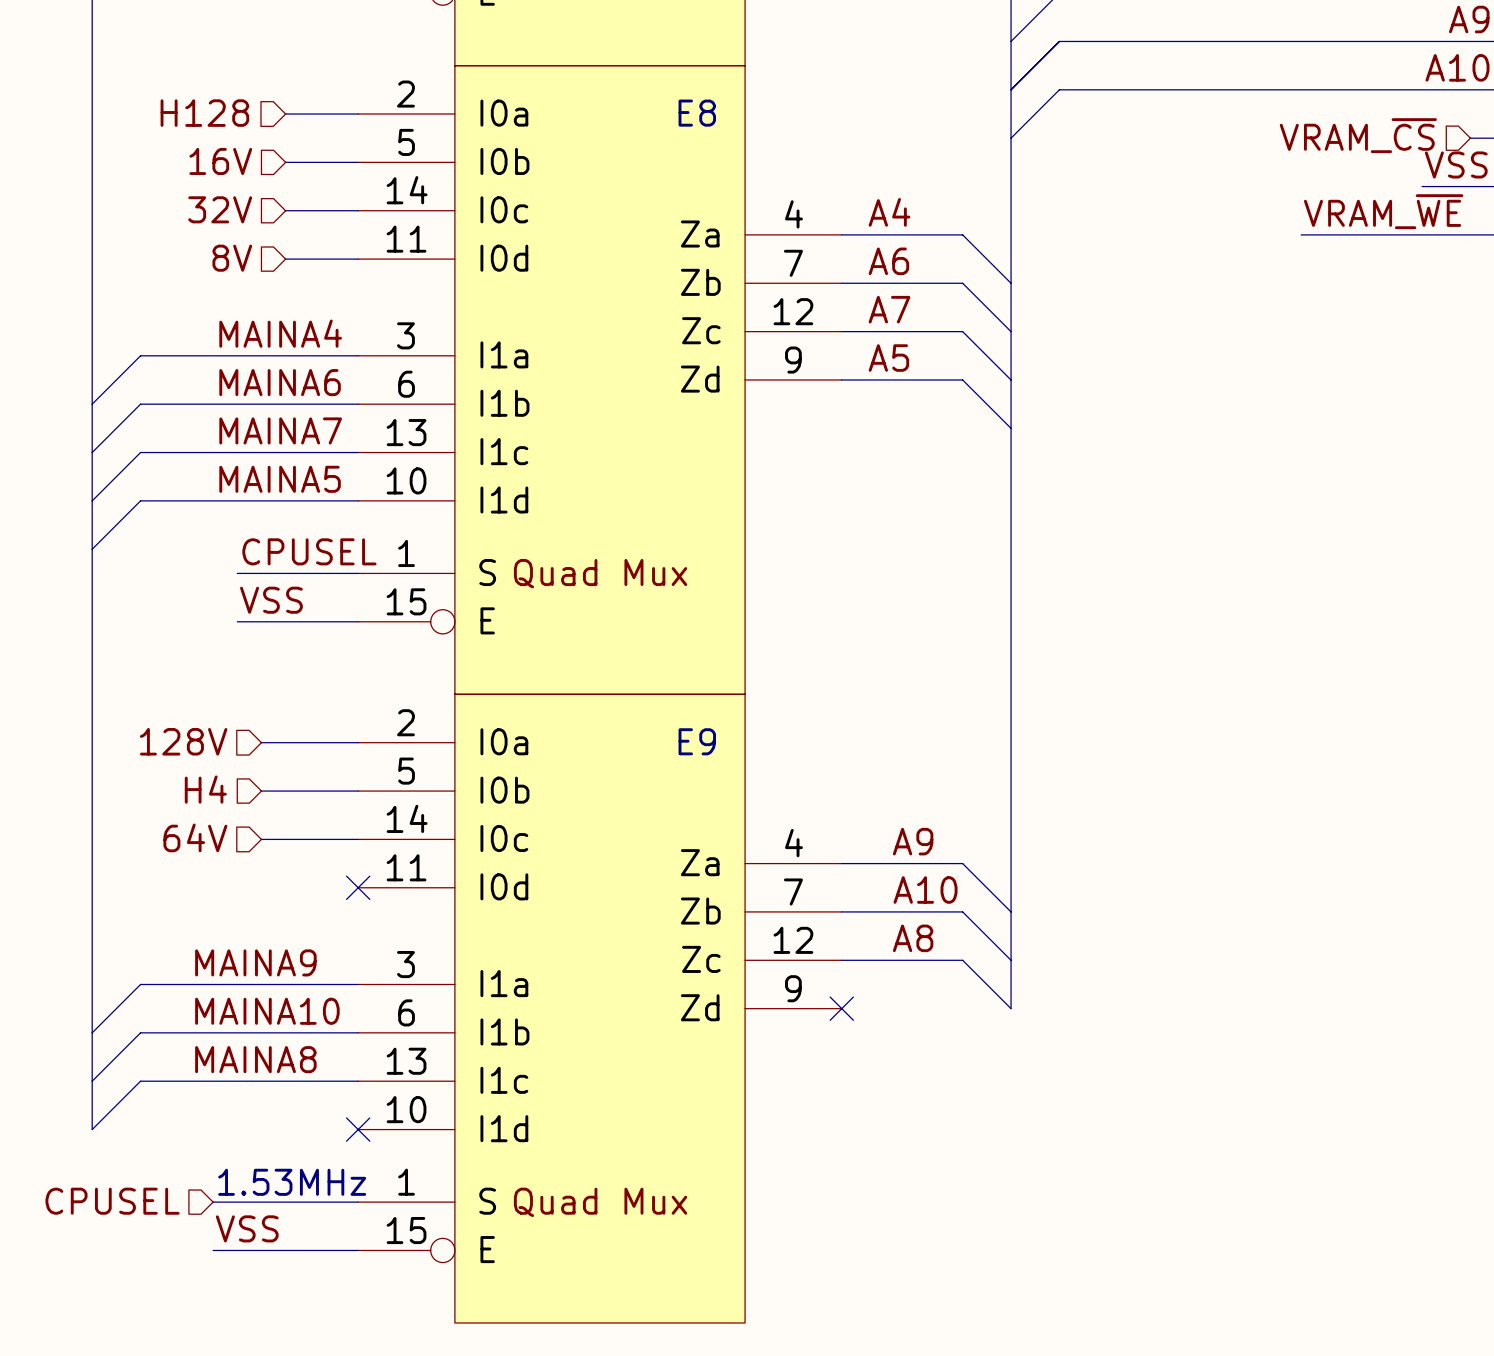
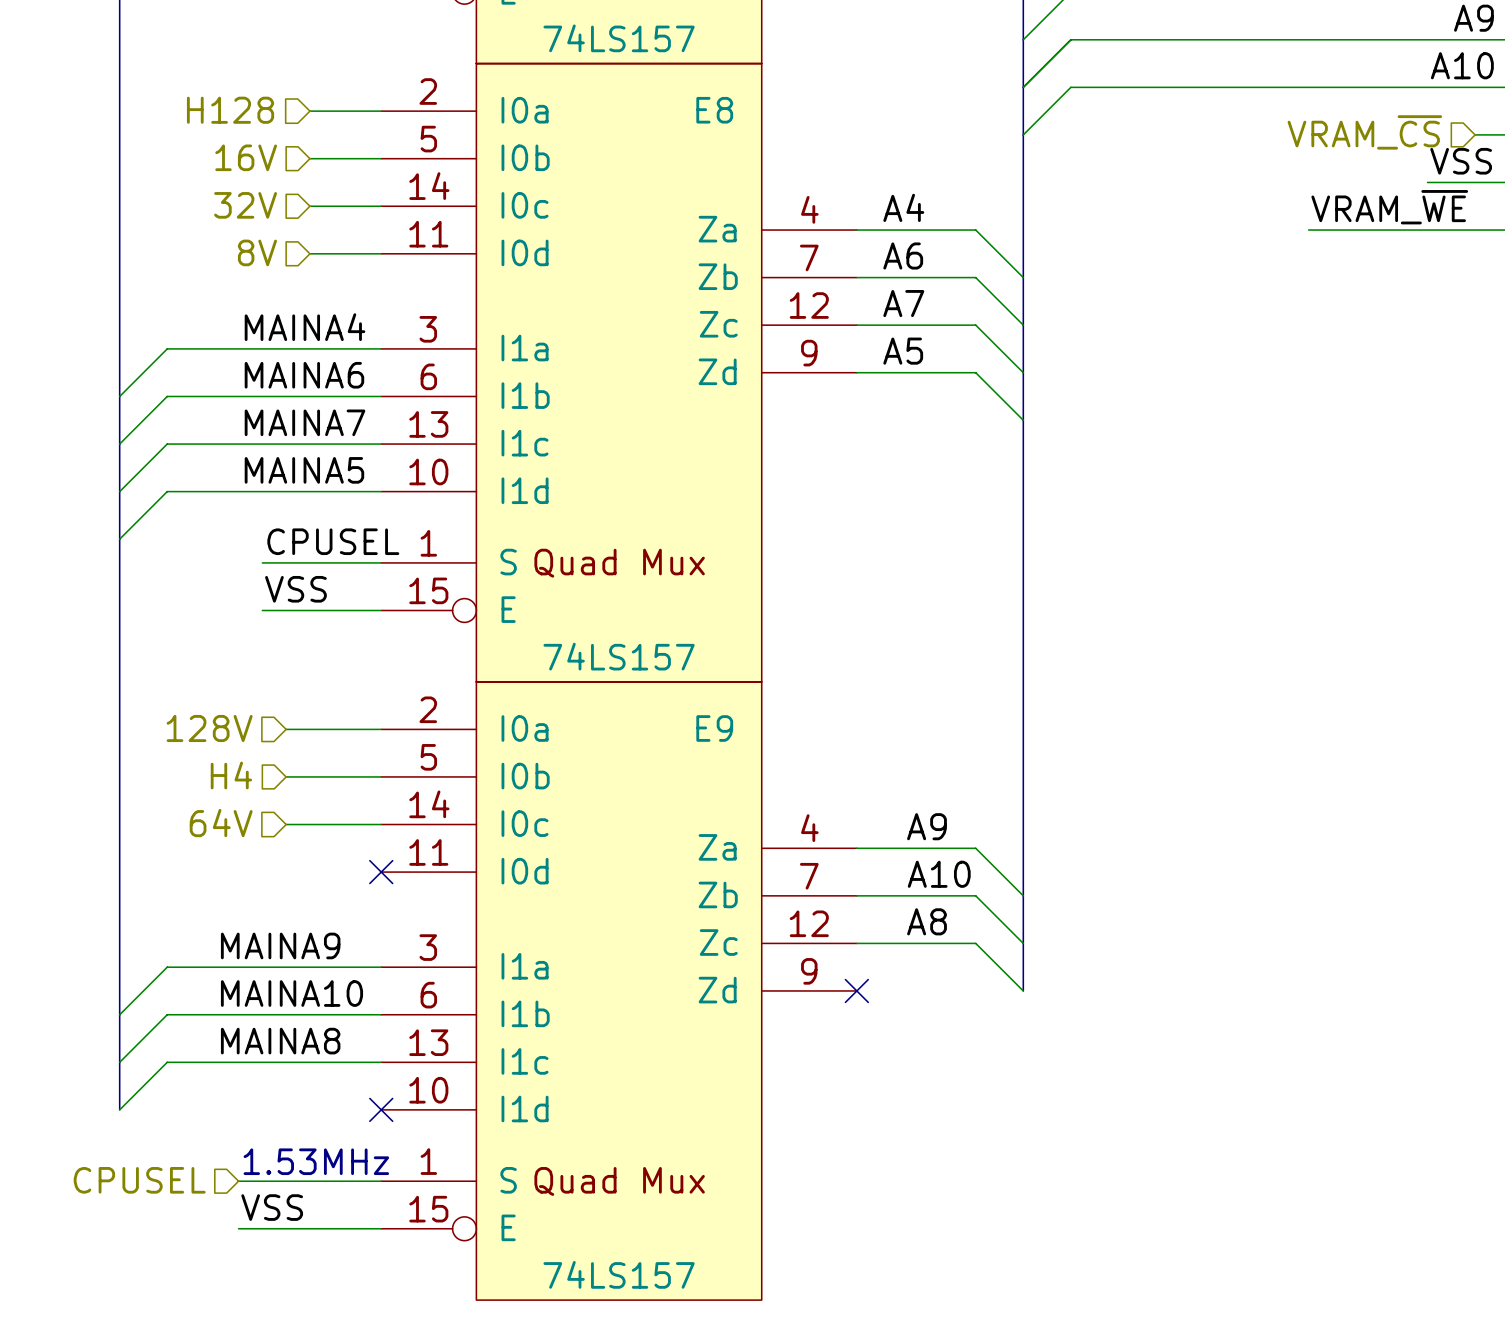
part value: none -> 74LS157 (619, 38)
E8 value: none -> 74LS157 (619, 656)
E9 value: none -> 74LS157 (619, 1274)

